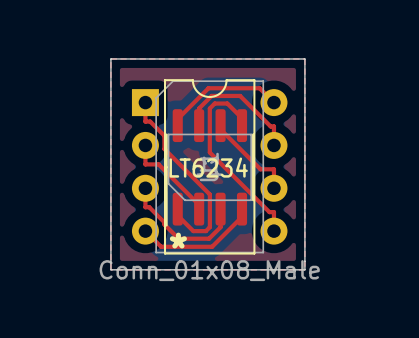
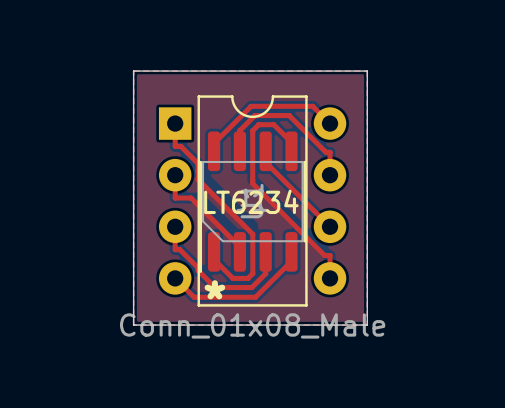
part footprint: [131, 79, 288, 255] -> [158, 95, 347, 307]
top track: (220, 129) (260, 169) (273, 169) (273, 188) -> (265, 155) (265, 162) (330, 226)

